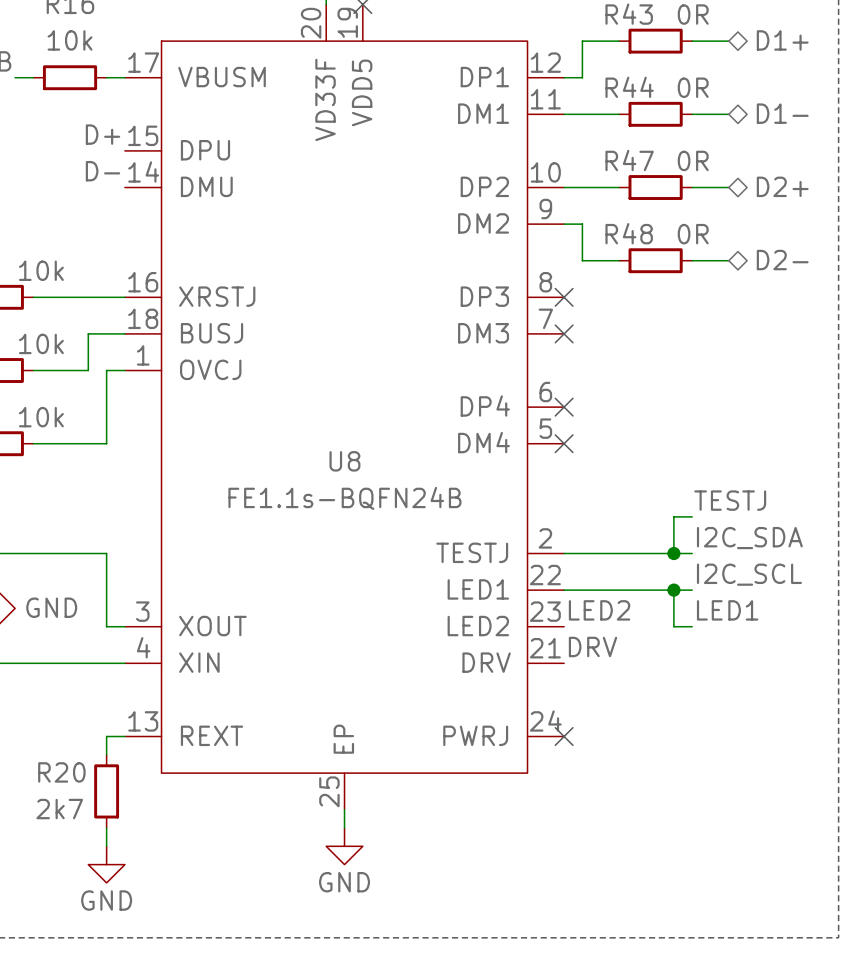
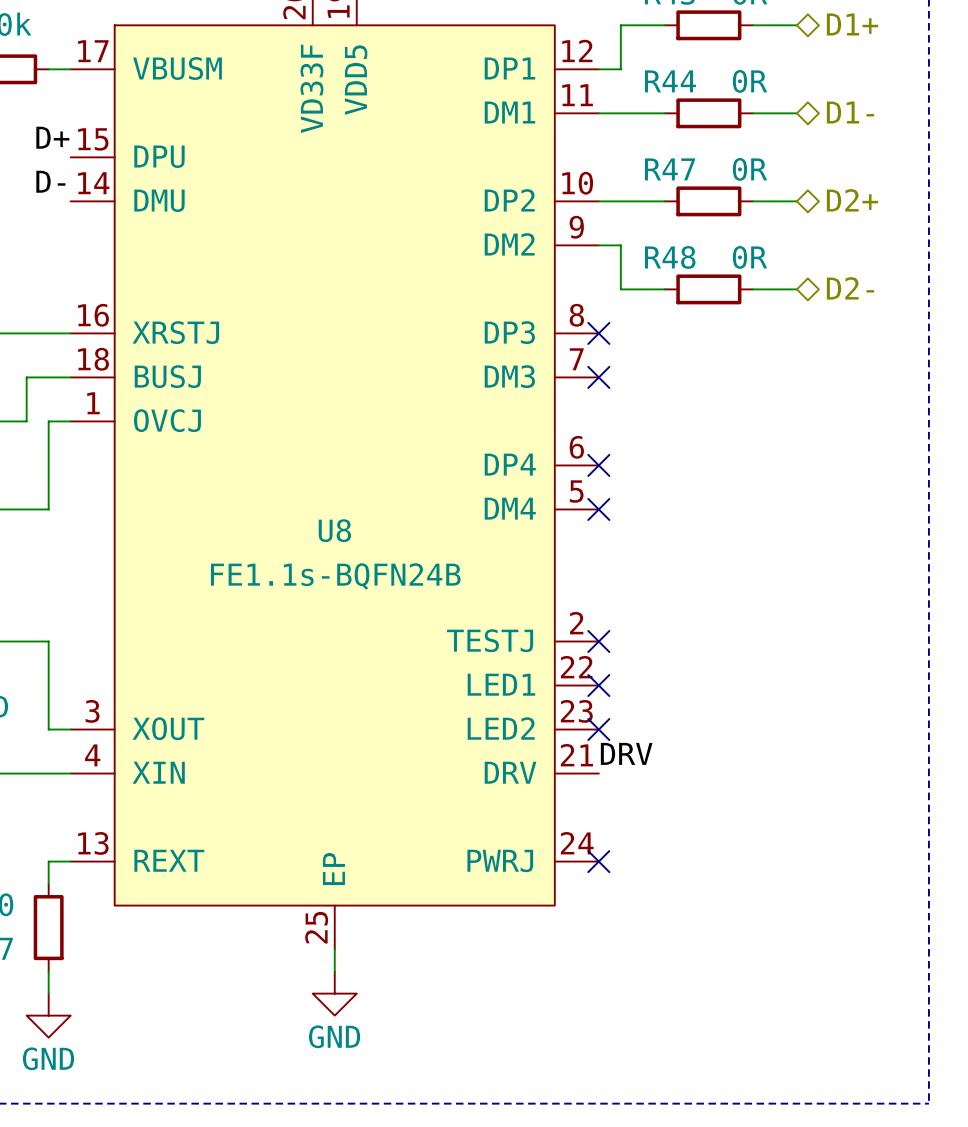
label: TESTJ (730, 500) -> none
wire: (692, 516) (673, 516) (673, 553) -> none
label: I2C_SDA (749, 538) -> none
wire: (564, 553) (692, 553) -> none
no-connect mark: none -> (598, 641)
junction: (673, 553) -> none
label: I2C_SCL (749, 574) -> none
wire: (564, 590) (692, 590) -> none
no-connect mark: none -> (598, 685)
wire: (673, 590) (673, 626) (692, 626) -> none
junction: (673, 590) -> none
label: LED2 (599, 610) -> none
label: LED1 (727, 610) -> none
no-connect mark: none -> (598, 729)

